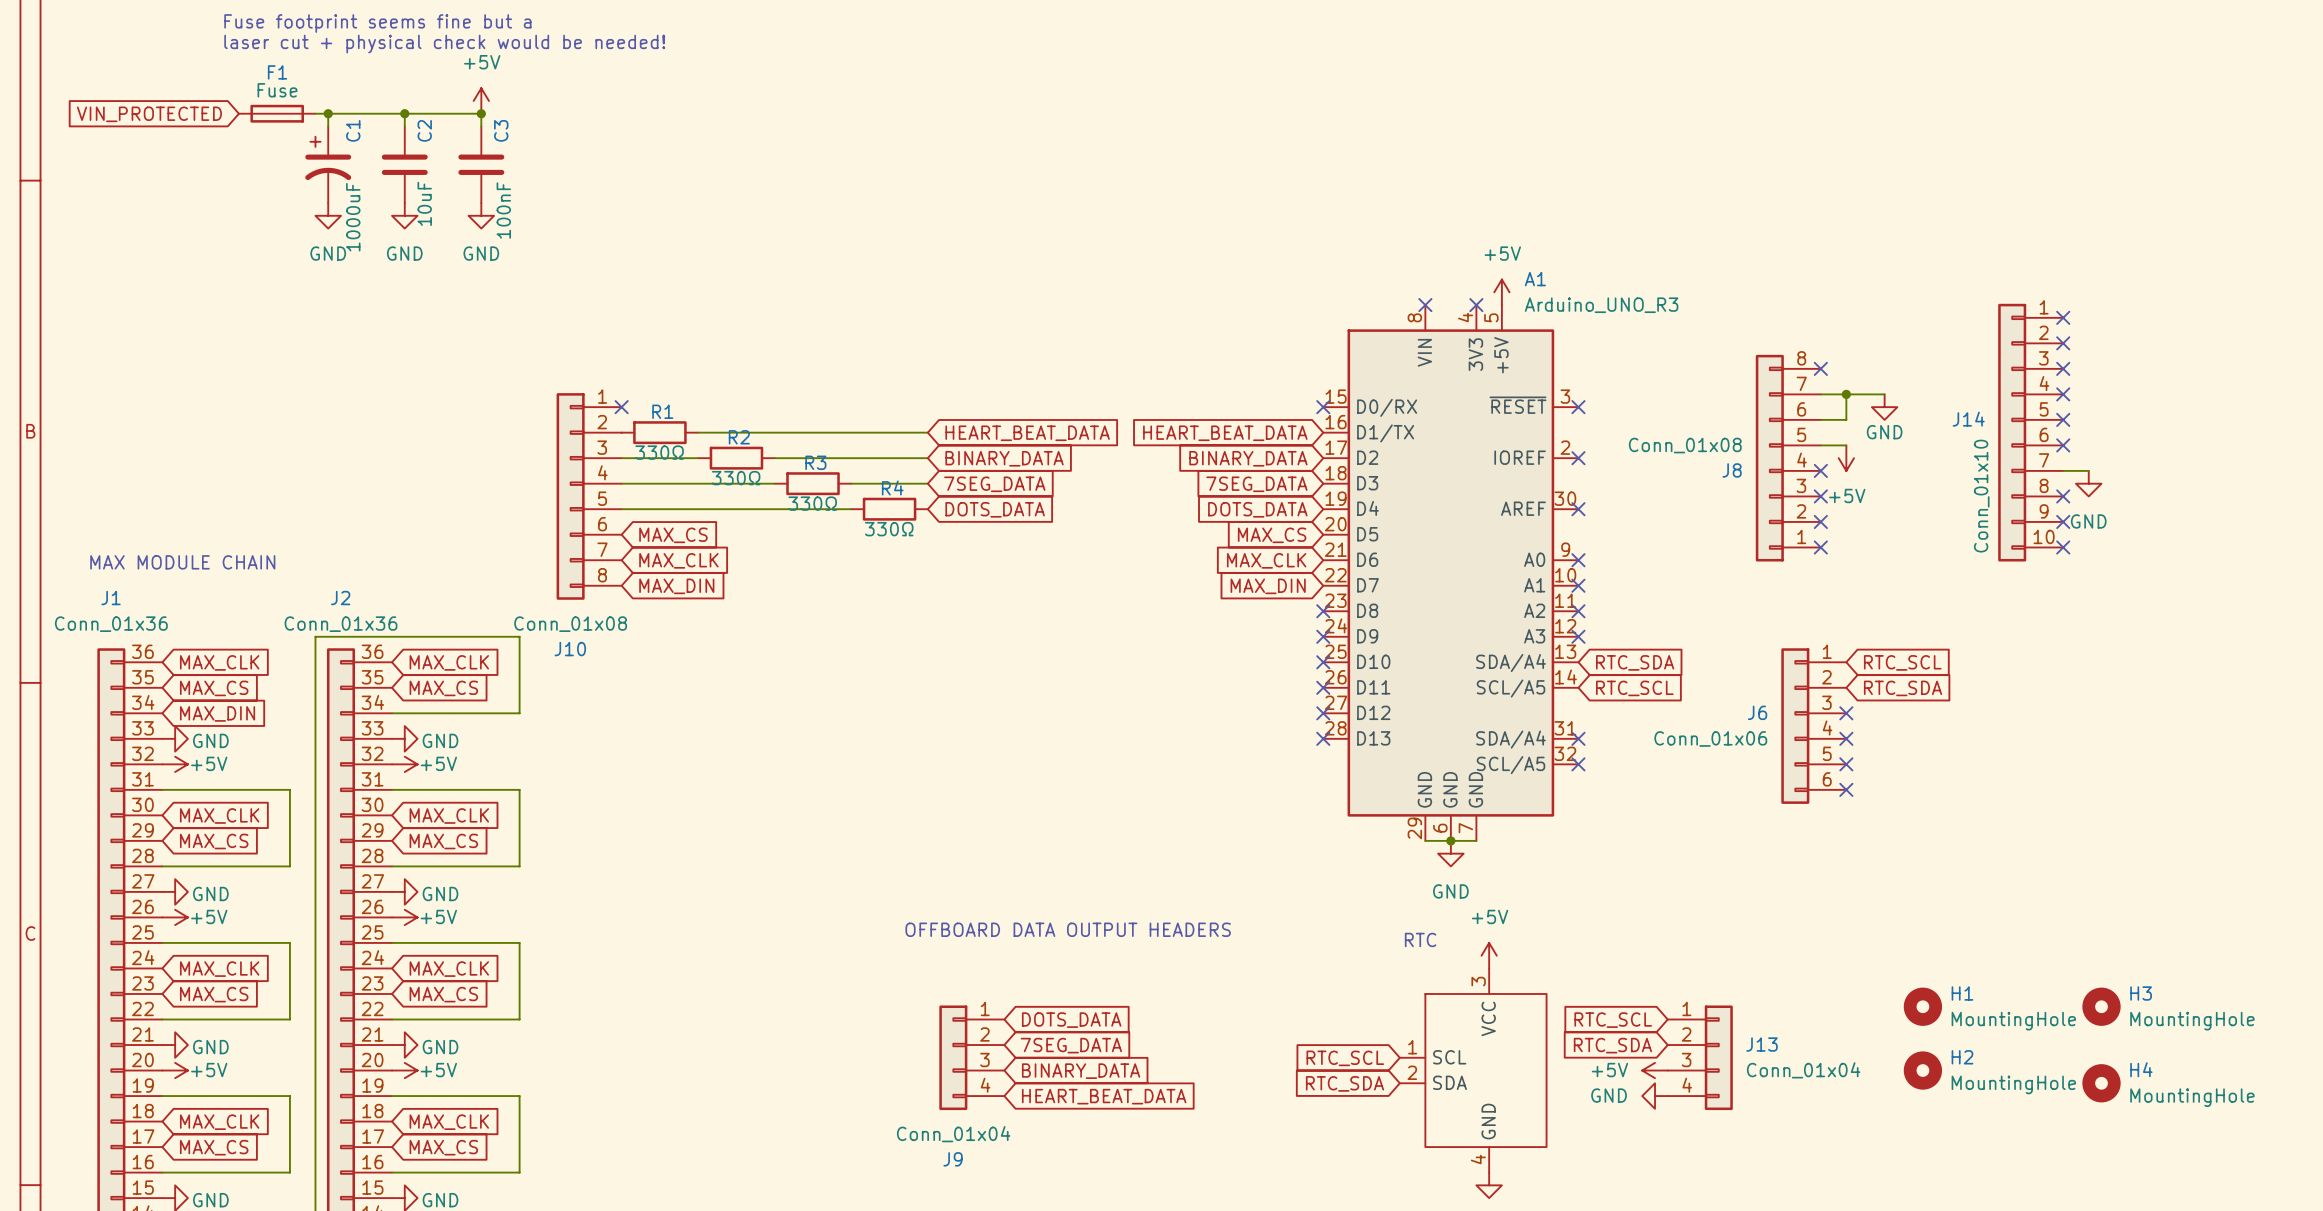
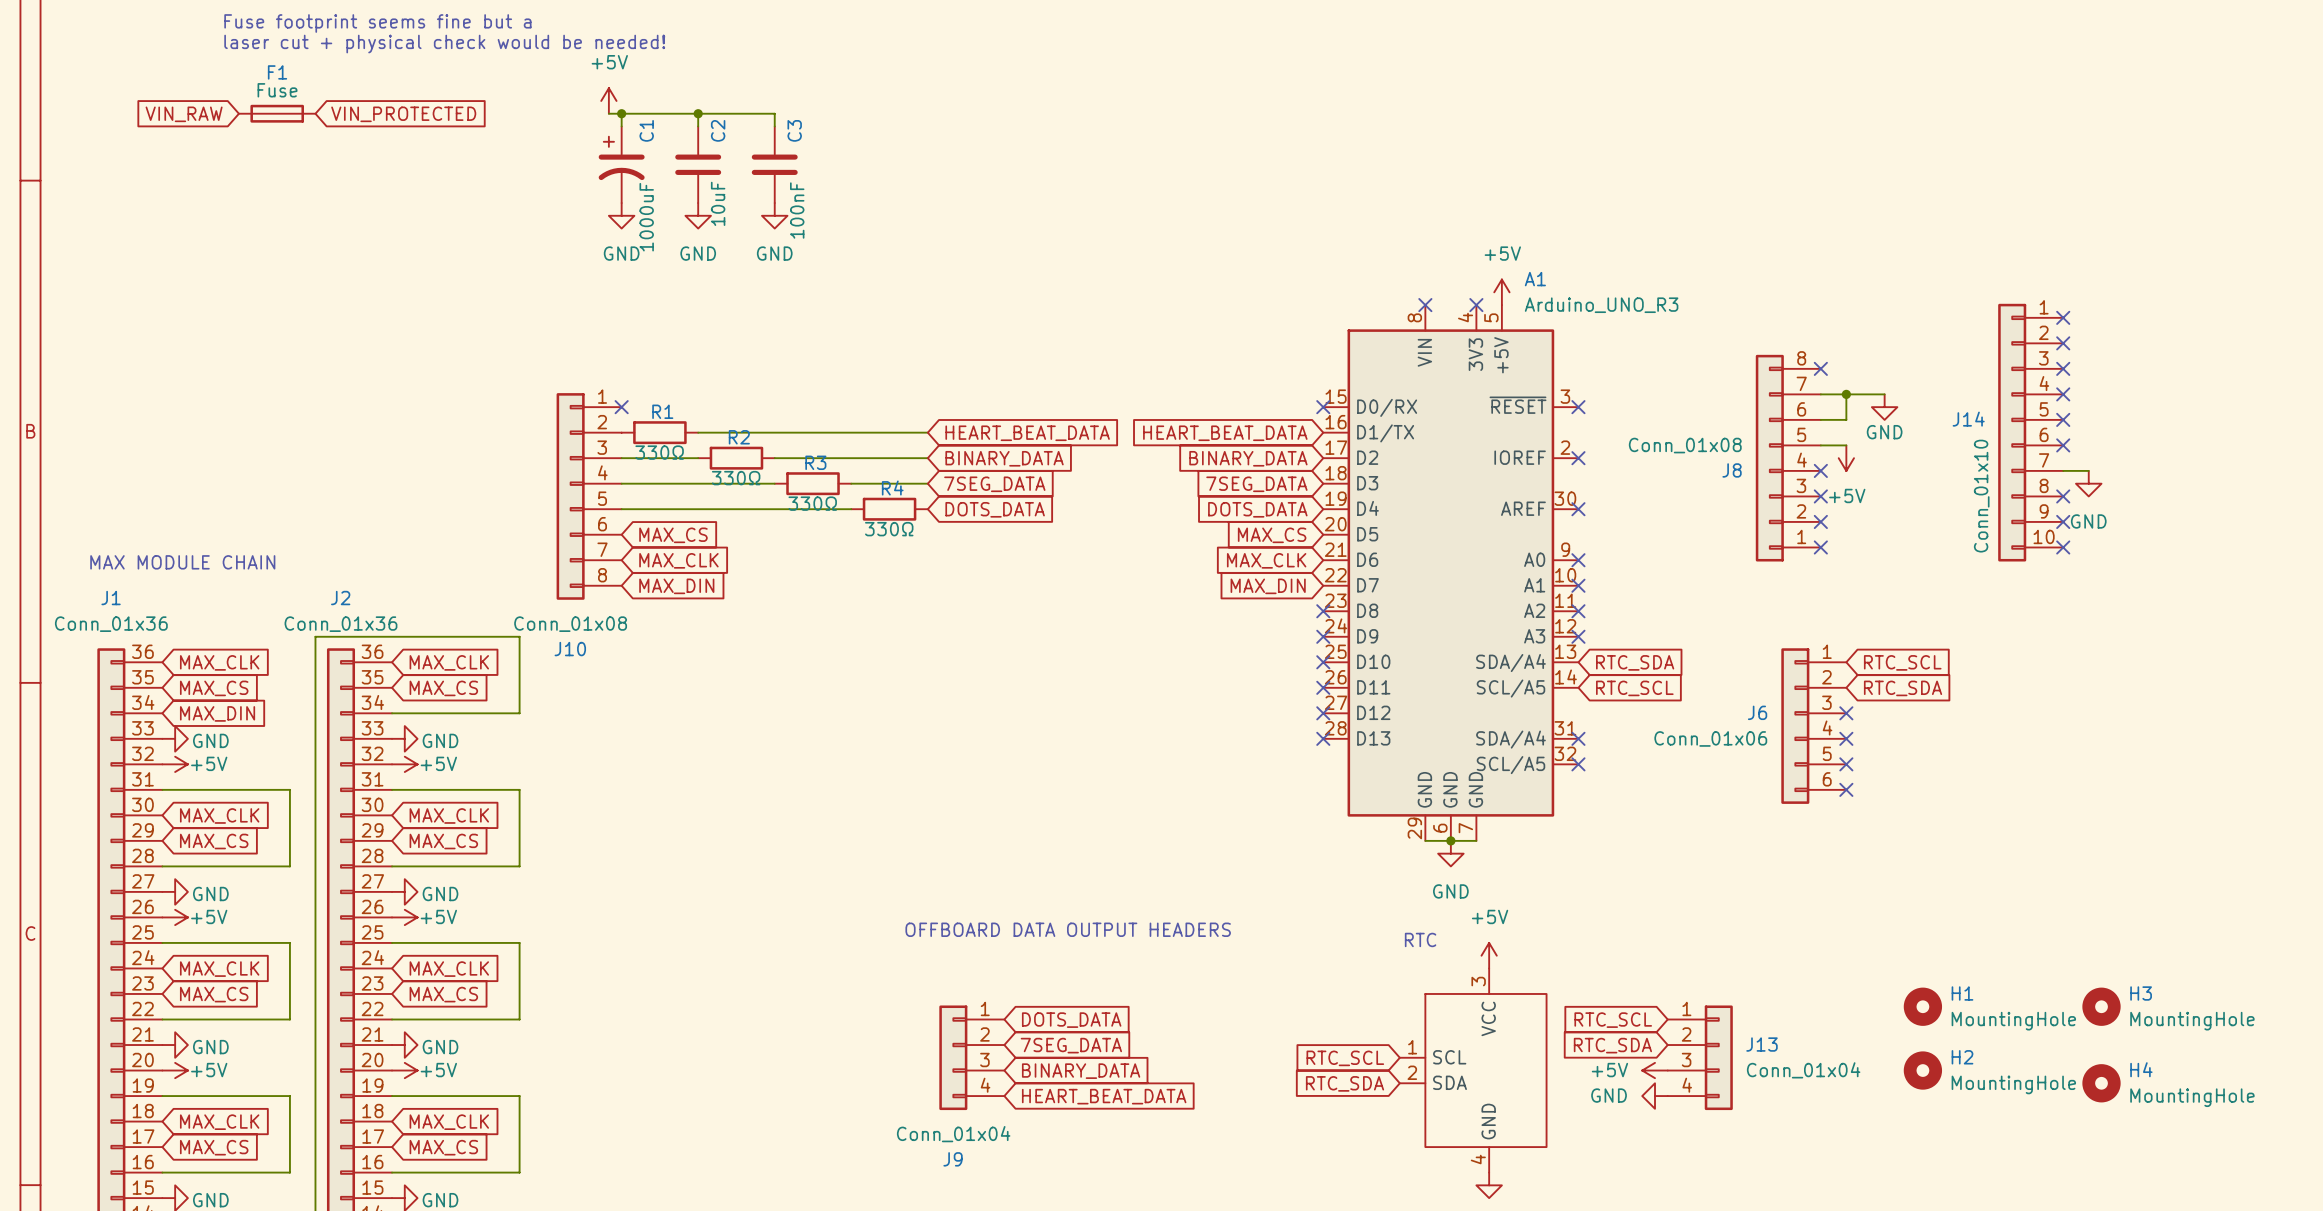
power symbol position: +5V (481, 100) -> +5V (608, 100)
wire: (315, 113) (481, 113) (481, 126) -> none
wire: (328, 113) (328, 126) -> none
junction: (328, 113) -> none
wire: (404, 113) (404, 126) -> (621, 113) (621, 126)
junction: (404, 113) -> none
junction: (481, 113) -> none
wire: none -> (608, 113) (774, 113) (774, 126)
junction: none -> (621, 113)
wire: none -> (698, 113) (698, 126)
junction: none -> (698, 113)
global label: VIN_PROTECTED (149, 114) -> VIN_RAW (184, 114)
global label: none -> VIN_PROTECTED (403, 114)
C1 position: (328, 164) -> (621, 164)
C2 position: (404, 164) -> (698, 164)
C3 position: (481, 164) -> (774, 164)
power symbol: GND (328, 215) -> none
power symbol: GND (404, 215) -> none
power symbol: GND (481, 215) -> none
power symbol: none -> GND (621, 215)
power symbol: none -> GND (698, 215)
power symbol: none -> GND (774, 215)

